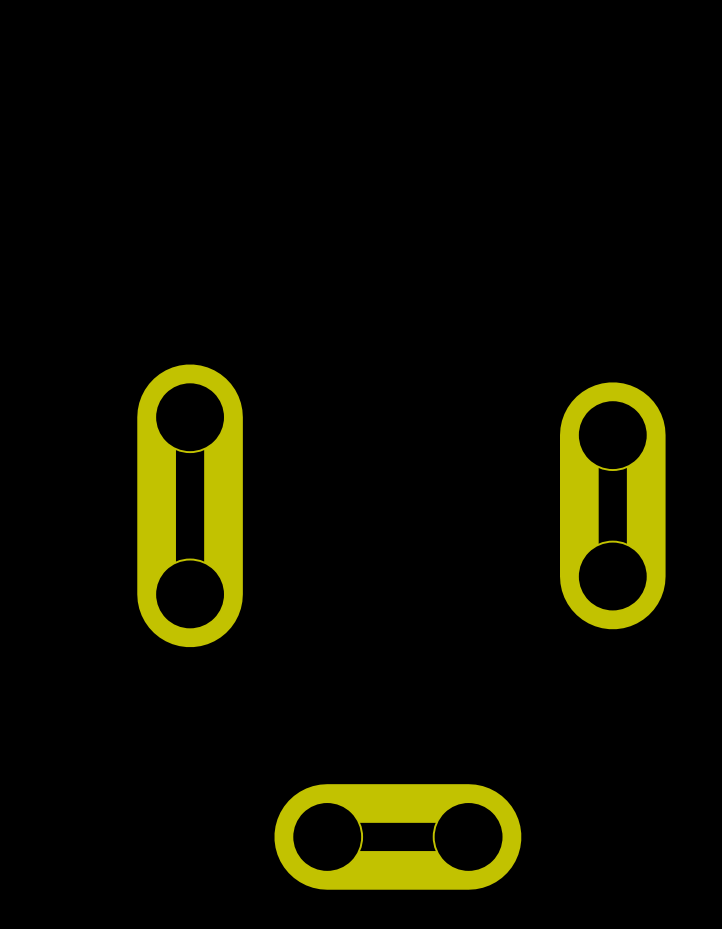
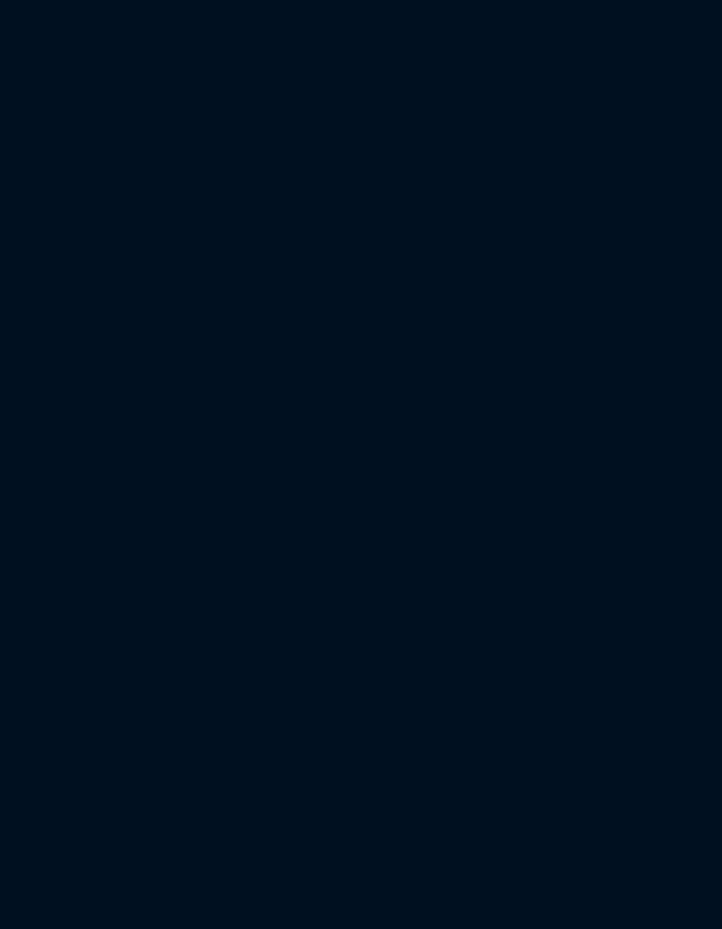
part: (401, 627) -> none

